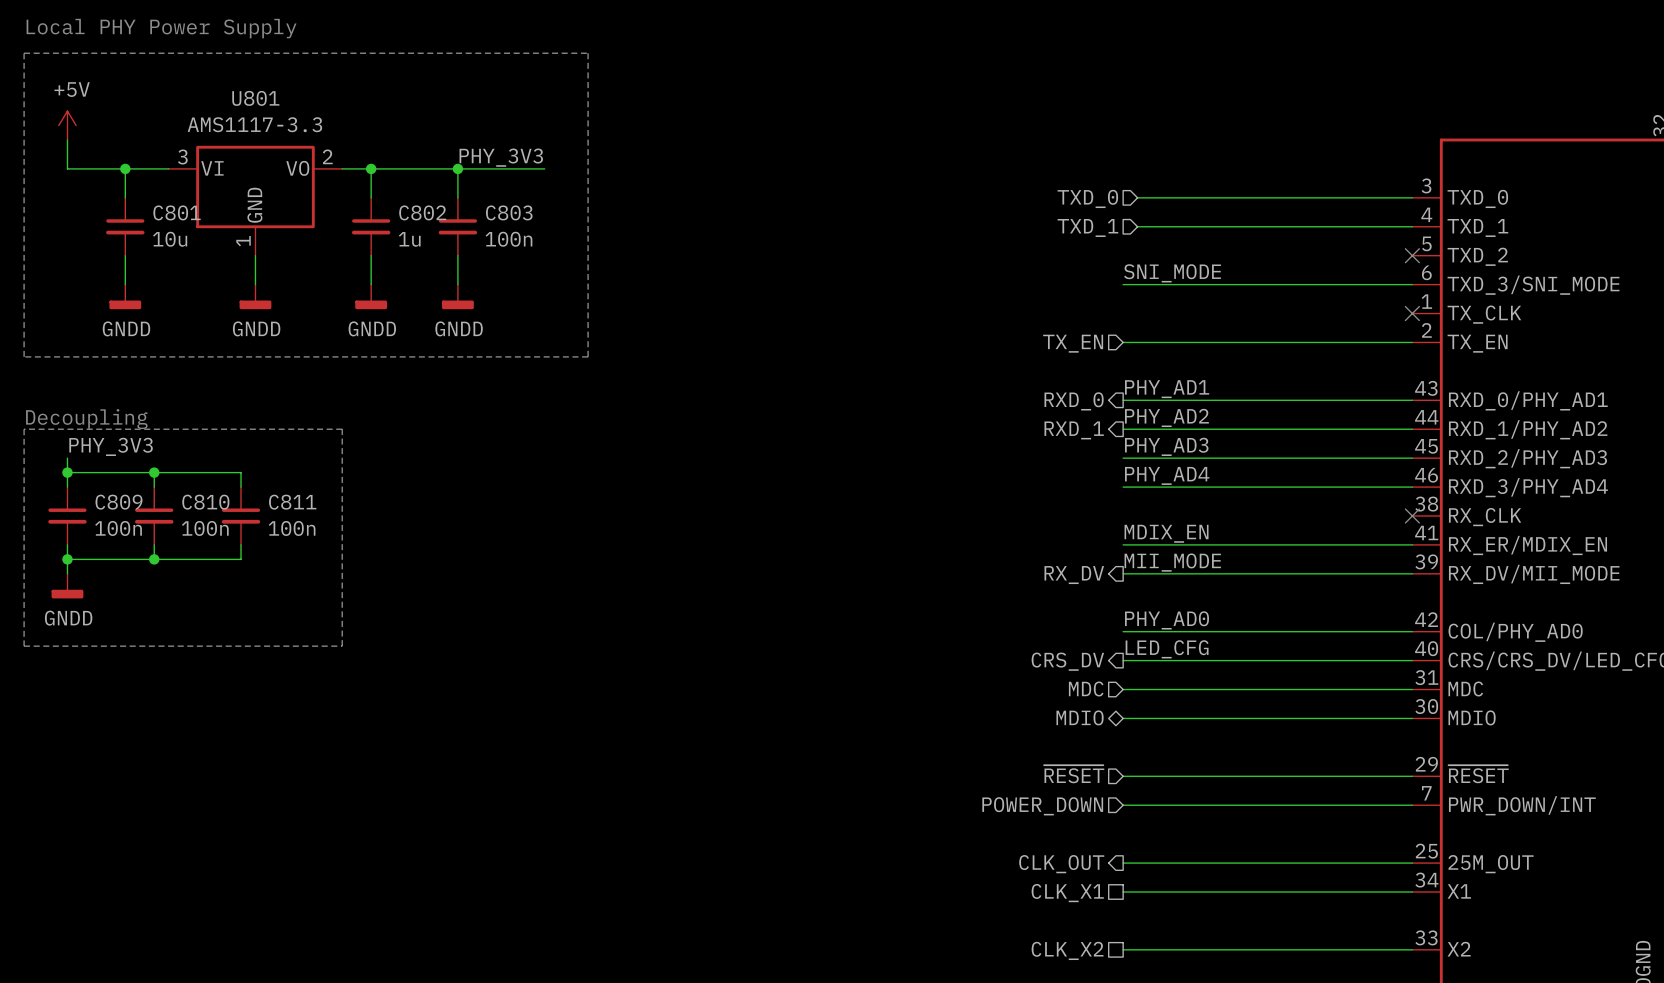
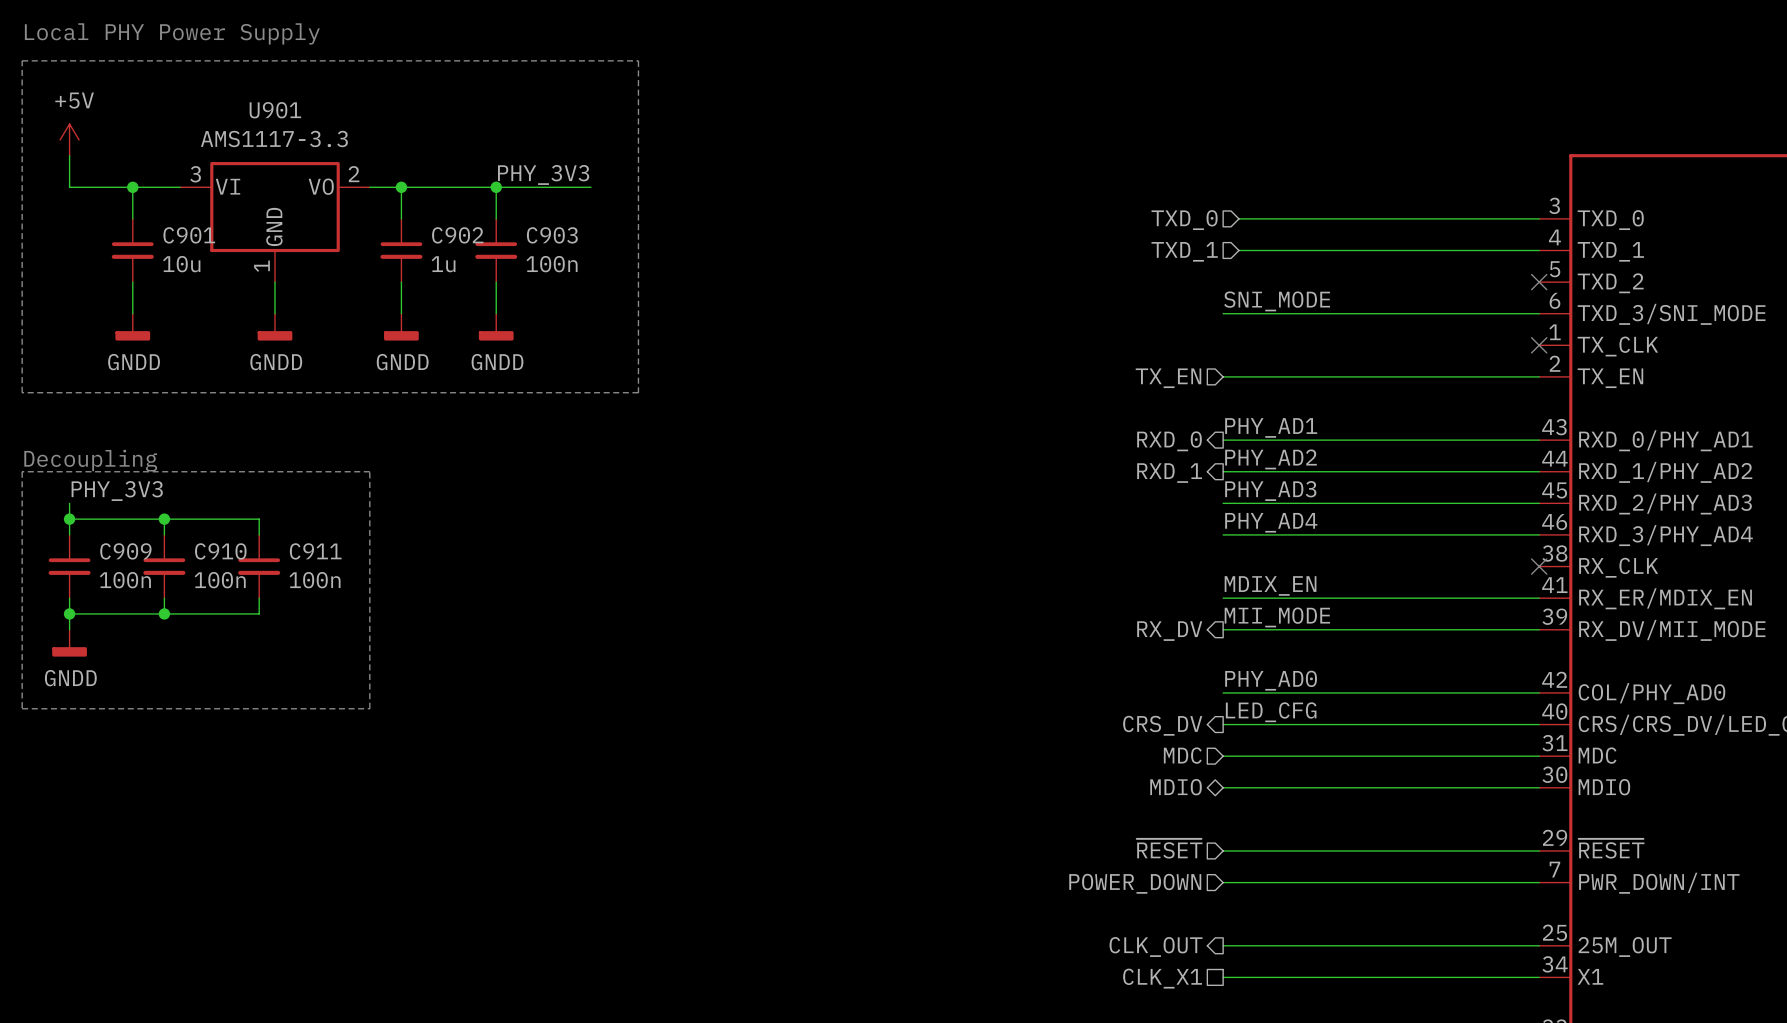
U801 name: U801 (255, 98) -> U901 (275, 110)
C801 name: C801 (177, 212) -> C901 (189, 235)
C802 name: C802 (422, 212) -> C902 (457, 235)
C803 name: C803 (509, 212) -> C903 (552, 235)
C809 name: C809 (119, 502) -> C909 (125, 551)
C810 name: C810 (205, 502) -> C910 (220, 551)
C811 name: C811 (292, 502) -> C911 (315, 551)

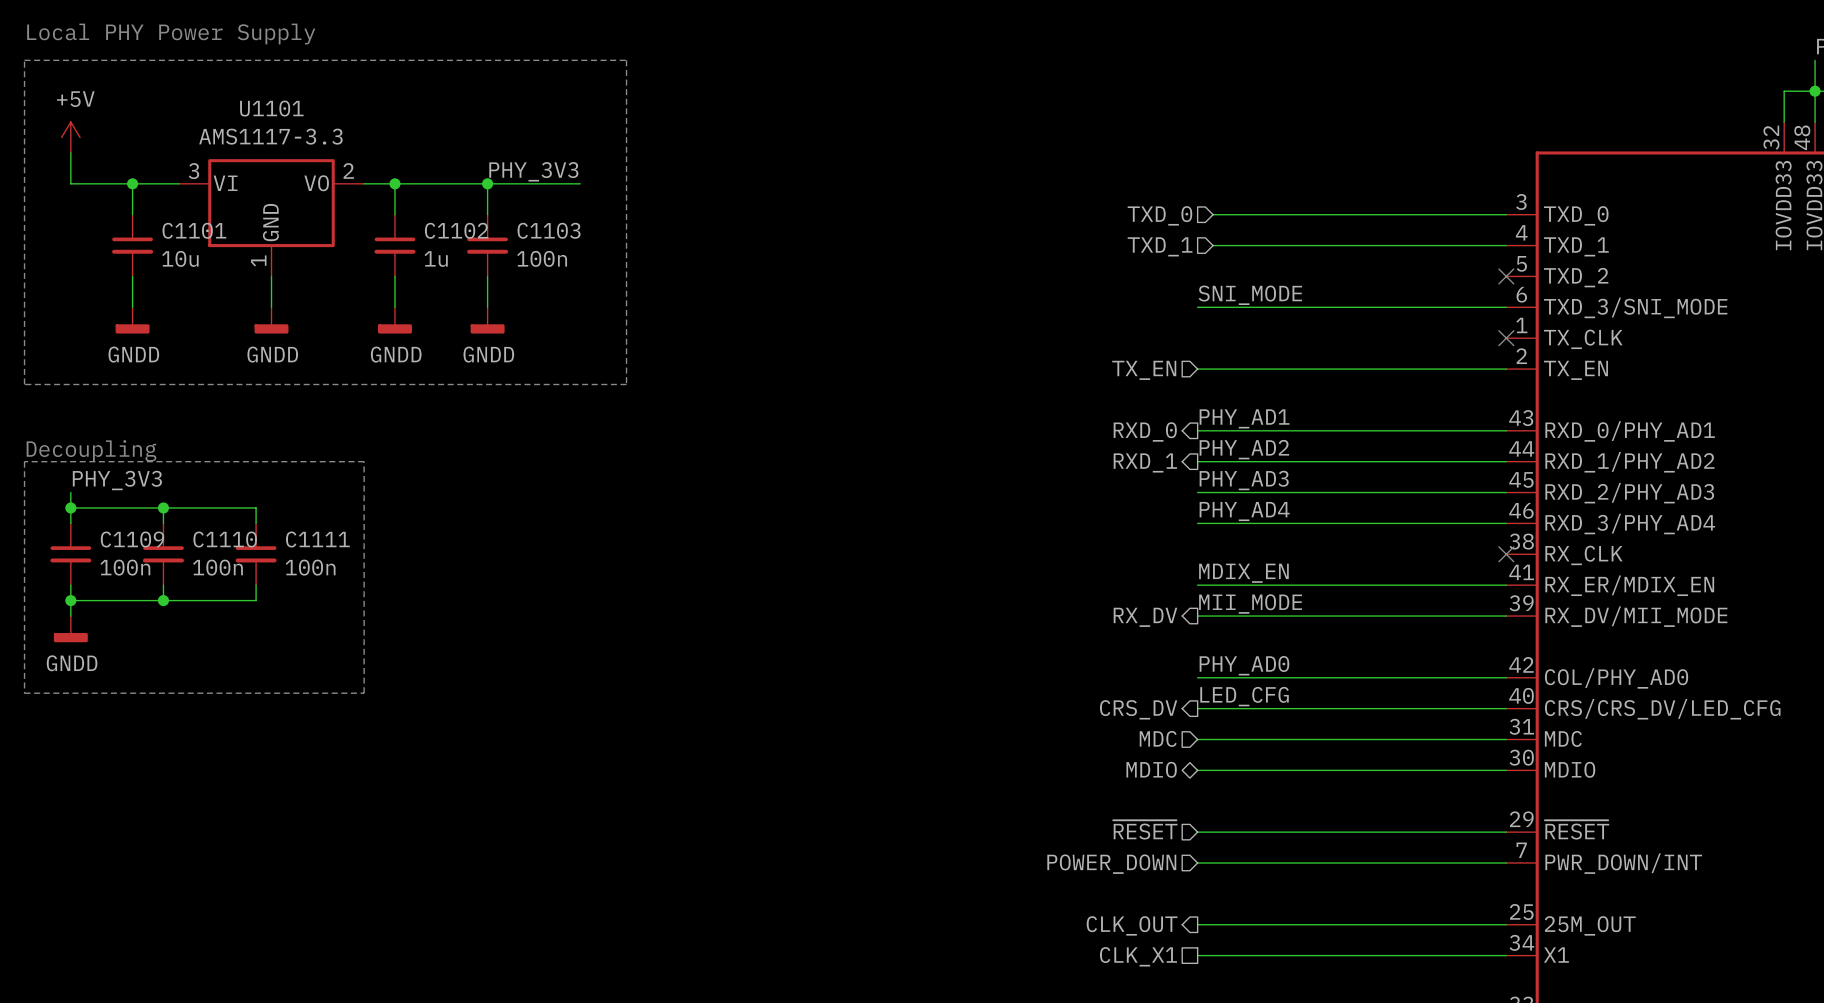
U901 name: U901 (275, 110) -> U1101 (271, 108)
C901 name: C901 (189, 235) -> C1101 (194, 230)
C902 name: C902 (457, 235) -> C1102 (456, 230)
C903 name: C903 (552, 235) -> C1103 (549, 230)
C909 name: C909 (125, 551) -> C1109 (132, 539)
C910 name: C910 (220, 551) -> C1110 (225, 539)
C911 name: C911 (315, 551) -> C1111 (317, 539)

